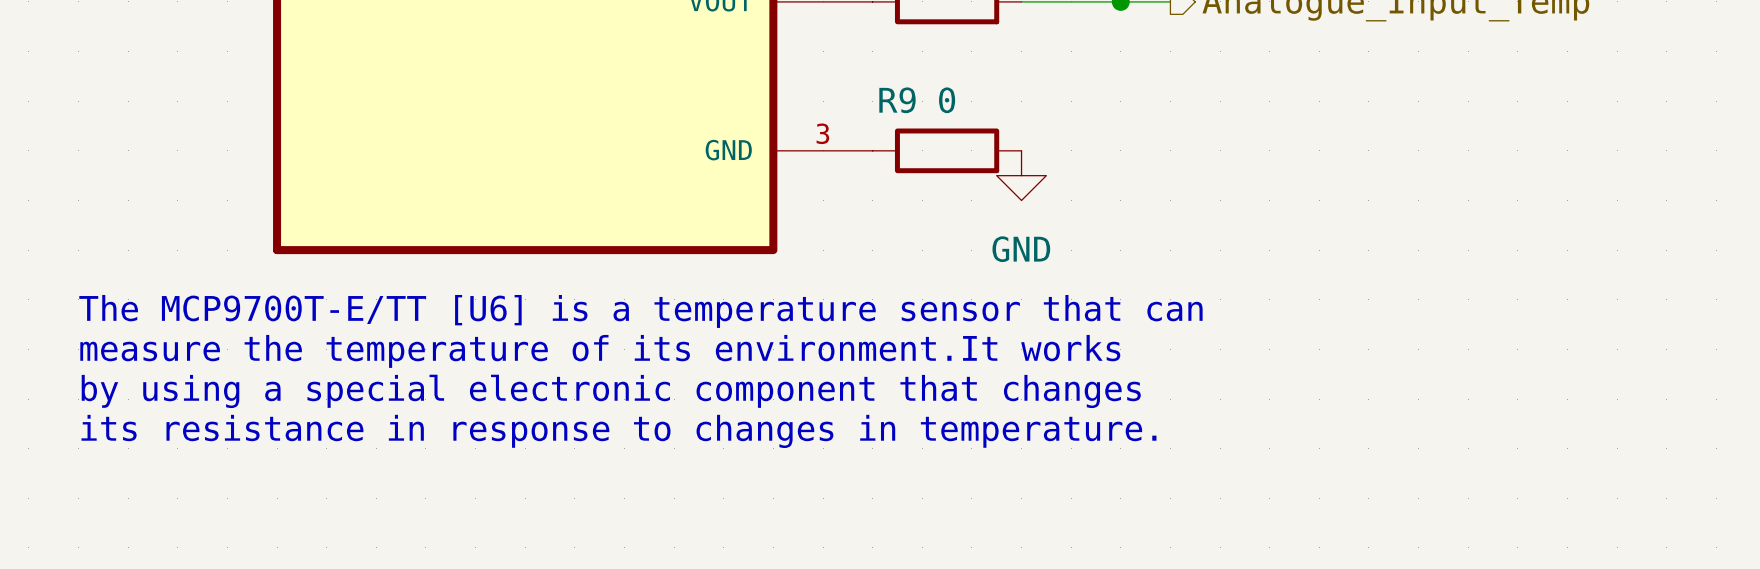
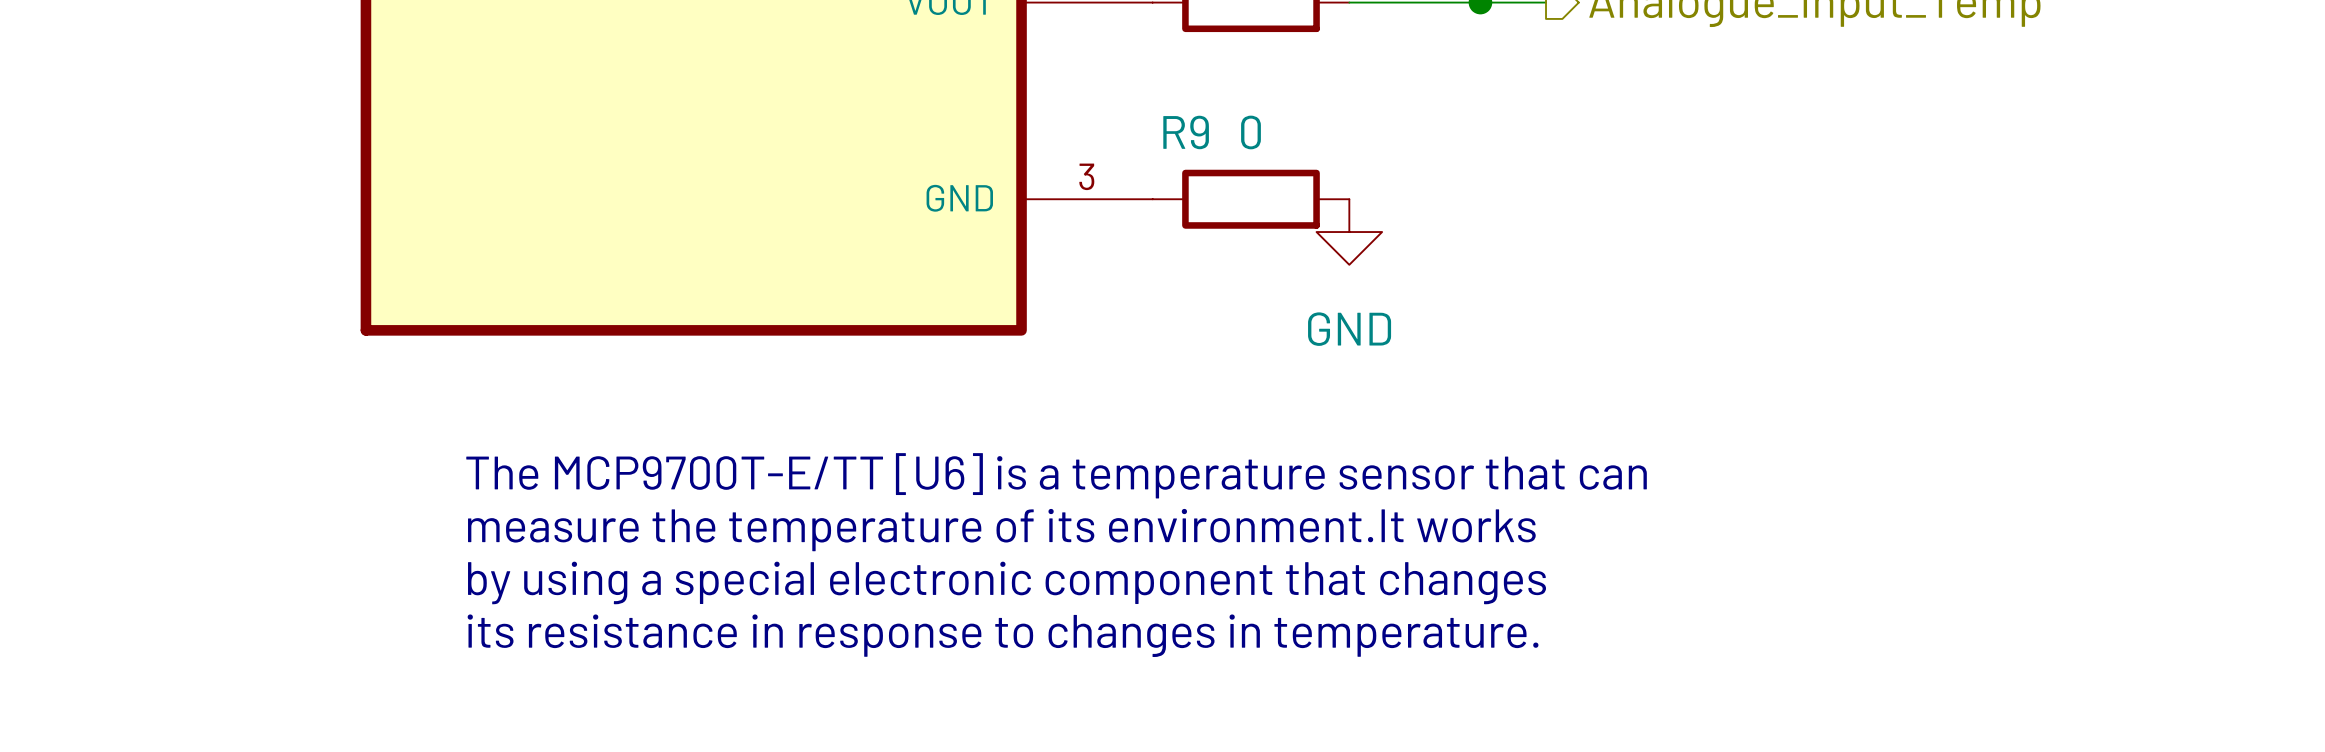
text position: The MCP9700T-E/TT [U6] is a temperature sensor that can (640, 311) -> The MCP9700T-E/TT [U6] is a temperature sensor that can (1056, 475)
text position: measure the temperature of its environment.It works (600, 351) -> measure the temperature of its environment.It works (1001, 530)
text position: by using a special electronic component that changes (611, 391) -> by using a special electronic component that changes (1007, 582)
text position: its resistance in response to changes in temperature. (618, 431) -> its resistance in response to changes in temperature. (1003, 635)

